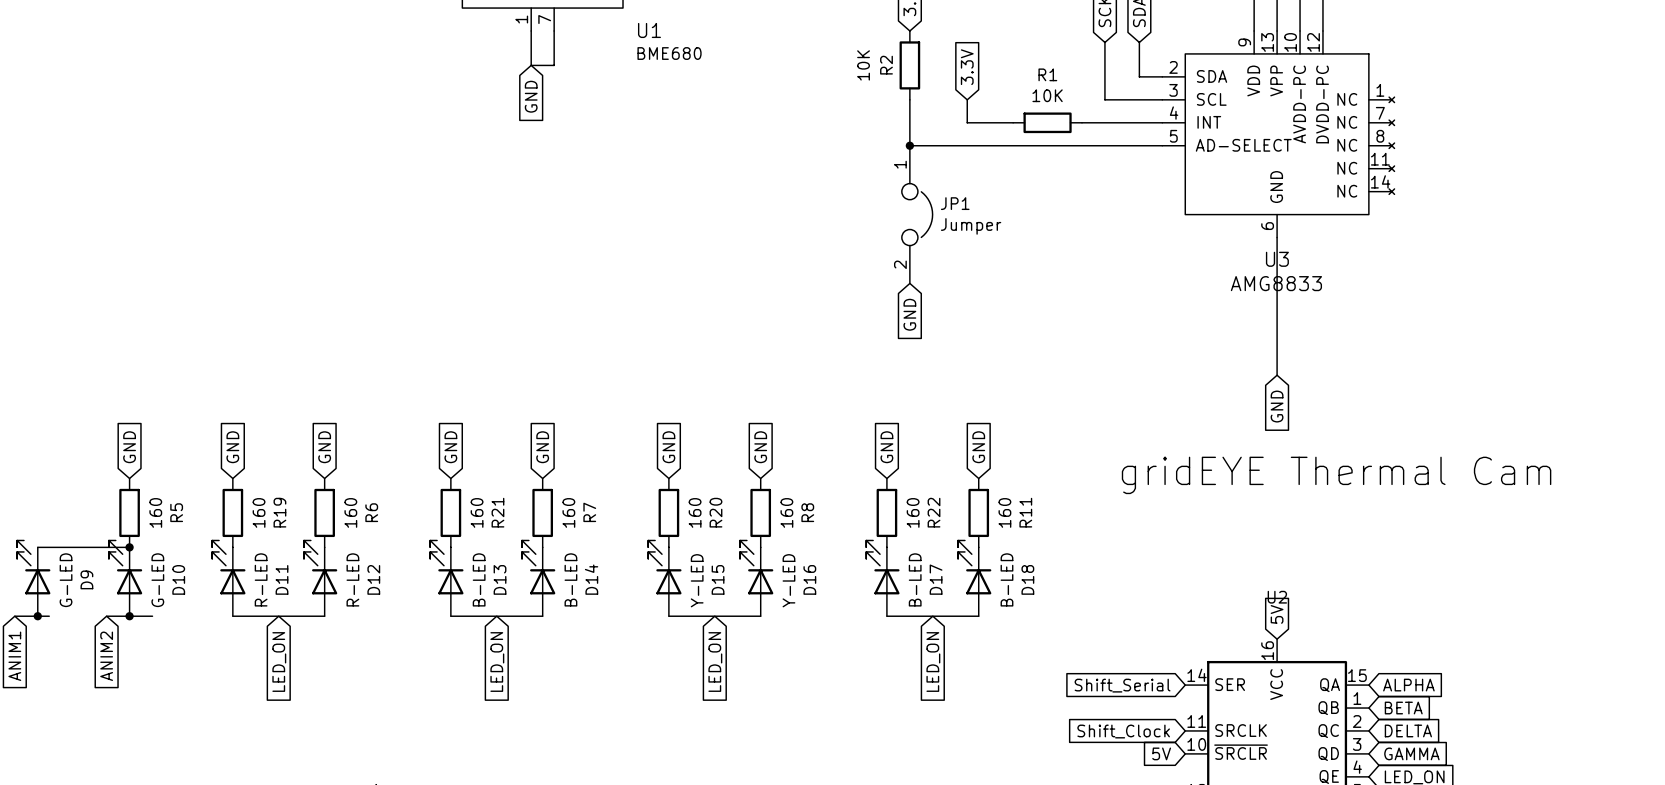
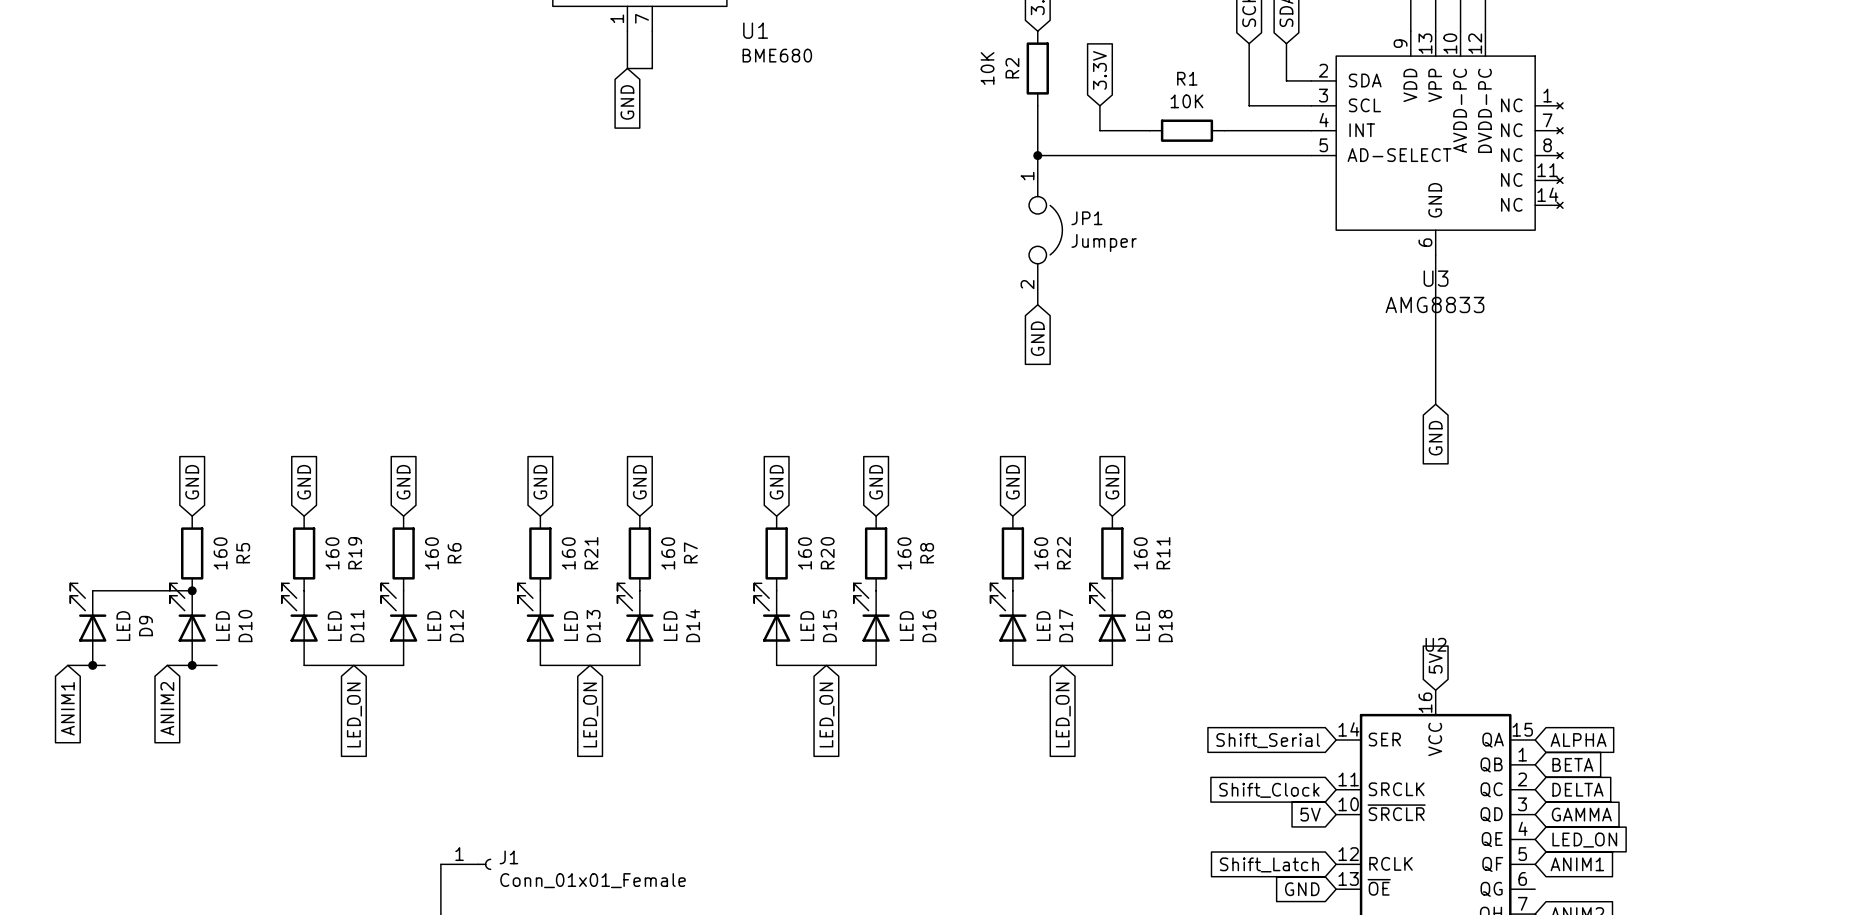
text: gridEYE Thermal Cam (1336, 475) -> none
D11 value: R-LED (261, 579) -> LED (334, 626)
D12 value: R-LED (352, 579) -> LED (434, 626)
D13 value: B-LED (479, 579) -> LED (571, 626)
D14 value: B-LED (570, 579) -> LED (670, 626)
D17 value: B-LED (915, 579) -> LED (1043, 626)
D18 value: B-LED (1006, 579) -> LED (1143, 626)
D9 value: G-LED (66, 580) -> LED (123, 626)
D10 value: G-LED (157, 580) -> LED (222, 626)
D15 value: Y-LED (697, 580) -> LED (807, 626)
D16 value: Y-LED (788, 580) -> LED (906, 626)

